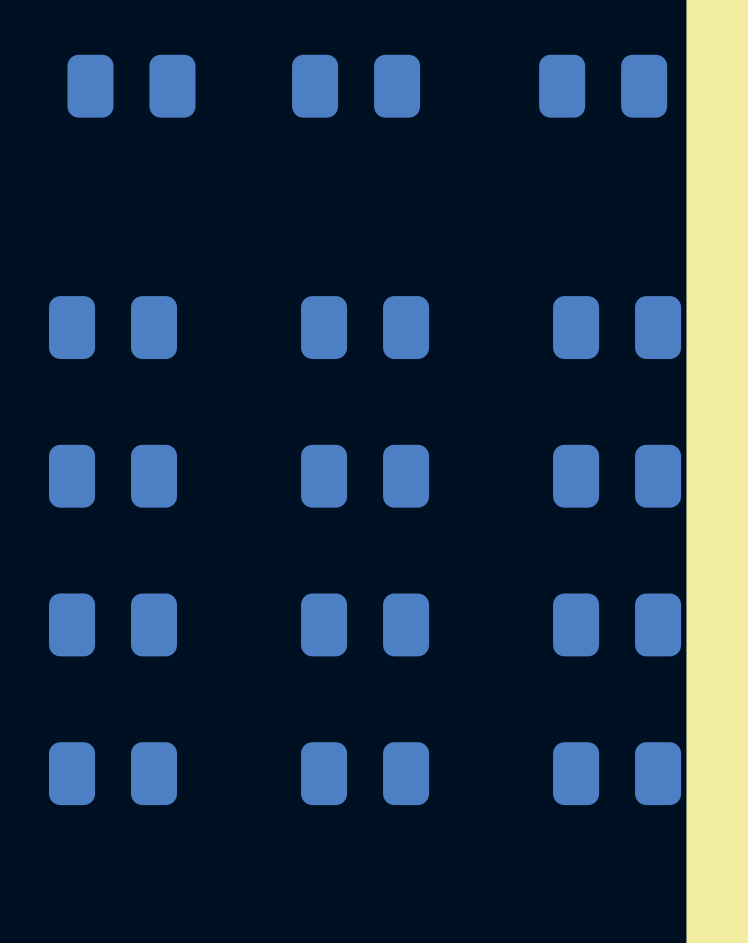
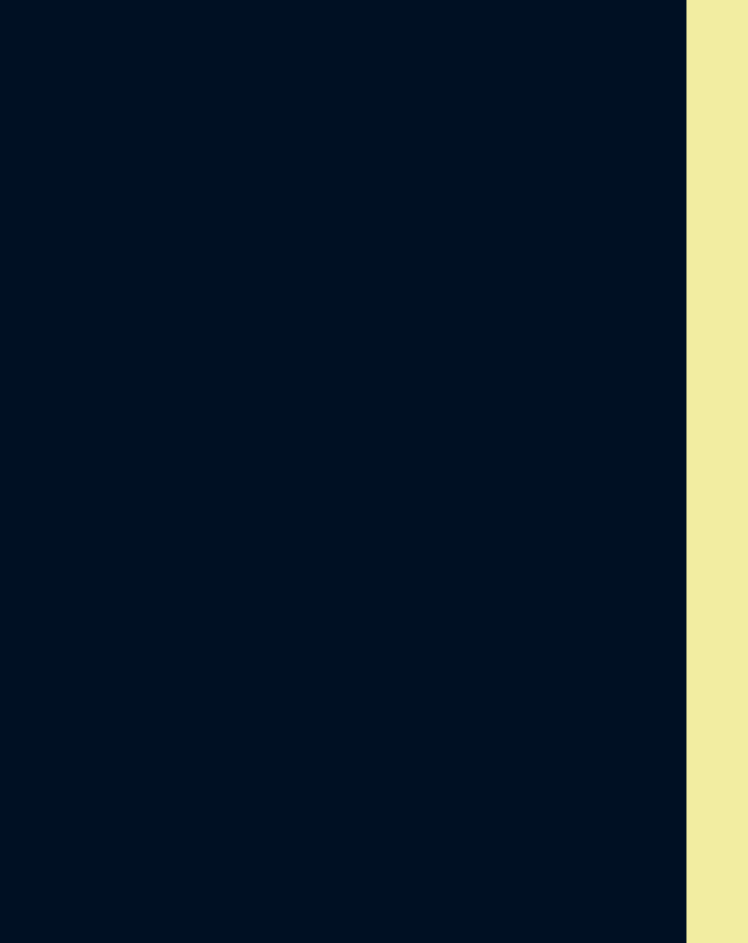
part: (131, 86) -> none
part: (356, 86) -> none
part: (603, 86) -> none
part: (113, 327) -> none
part: (365, 327) -> none
part: (617, 327) -> none
part: (113, 476) -> none
part: (365, 476) -> none
part: (617, 476) -> none
part: (113, 624) -> none
part: (365, 624) -> none
part: (617, 624) -> none
part: (113, 773) -> none
part: (365, 773) -> none
part: (617, 773) -> none

